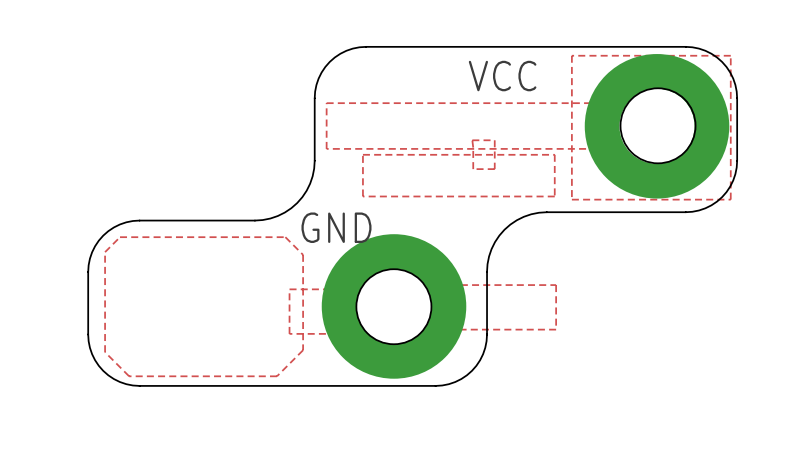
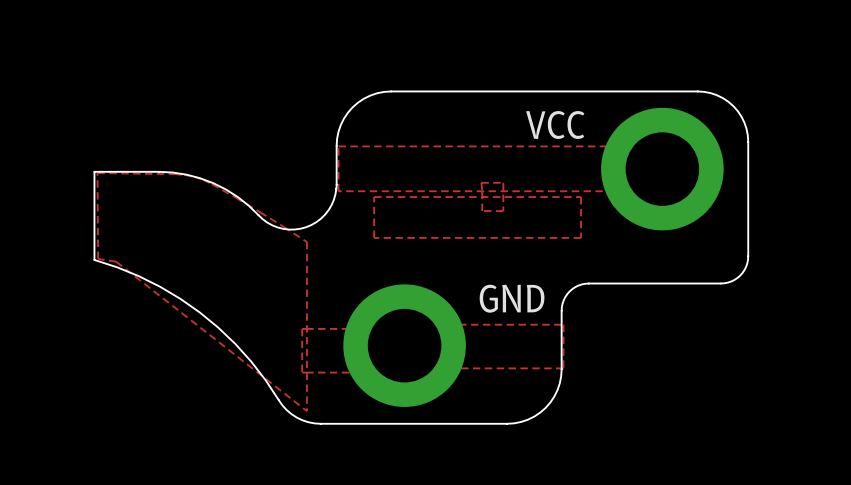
board edge: (366, 46) (685, 46) (705, 50) (717, 57) (726, 66) (735, 84) (737, 160) (733, 180) (726, 192) (717, 201) (705, 208) (692, 211) (538, 212) (523, 216) (510, 224) (495, 242) (489, 256) (487, 271) (487, 334) (483, 354) (476, 365) (466, 375) (448, 384) (435, 385) (139, 385) (119, 382) (108, 375) (95, 360) (88, 341) (88, 265) (92, 252) (98, 240) (113, 227) (132, 221) (262, 220) (277, 216) (291, 208) (306, 190) (312, 176) (314, 160) (314, 98) (318, 78) (325, 66) (334, 57) (346, 50) (366, 46) -> (391, 91) (377, 93) (363, 98) (352, 107) (343, 118) (337, 138) (336, 186) (333, 199) (325, 214) (311, 225) (294, 229) (272, 225) (225, 189) (186, 174) (158, 171) (94, 171) (94, 259) (117, 267) (160, 286) (199, 312) (235, 344) (251, 361) (286, 409) (302, 420) (320, 423) (507, 423) (528, 419) (545, 407) (557, 390) (561, 369) (561, 307) (565, 297) (572, 289) (588, 283) (724, 283) (737, 277) (744, 269) (748, 256) (747, 135) (744, 122) (737, 111) (723, 98) (710, 93) (697, 91) (391, 91)
via size: [584, 54, 730, 199] -> [601, 107, 724, 231]
top zone outline: (571, 55) (571, 199) (730, 199) (730, 55) (571, 55) -> none
text position: VCC (502, 76) -> VCC (555, 124)
round board edge: [620, 88, 696, 164] -> none
top zone outline: none -> (97, 173) (174, 174) (193, 176) (211, 184) (236, 197) (306, 242) (306, 411) (116, 261) (98, 258) (97, 173)
top zone outline: (554, 154) (554, 196) -> (562, 197) (581, 197) (581, 237) (562, 237)
text position: GND (336, 227) -> GND (512, 298)
via size: [321, 234, 467, 379] -> [343, 284, 466, 407]
top zone outline: (120, 237) (285, 237) (303, 254) (303, 350) (276, 376) (129, 376) (105, 352) (105, 252) (120, 237) -> none
round board edge: [356, 269, 432, 345] -> none

